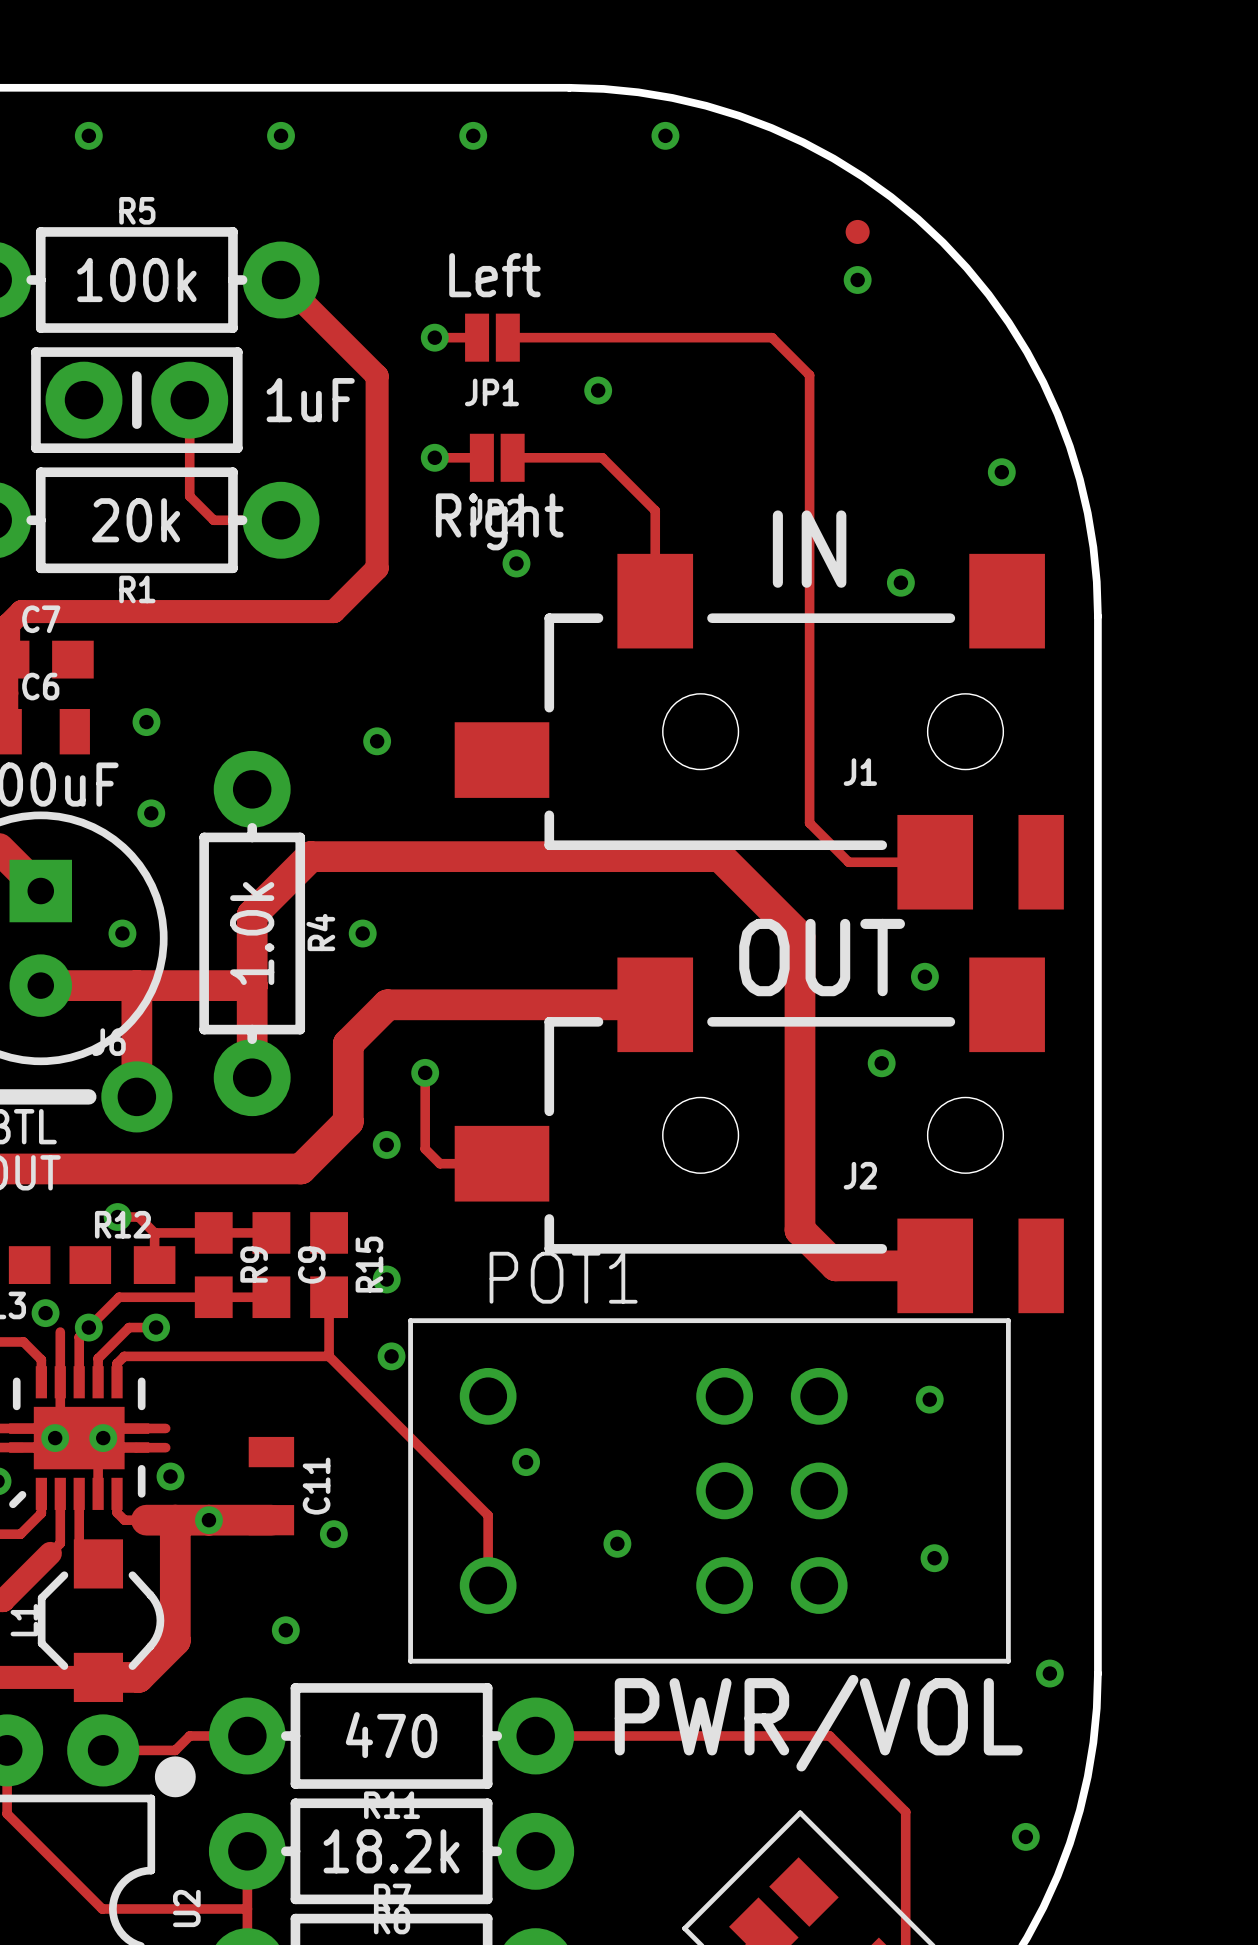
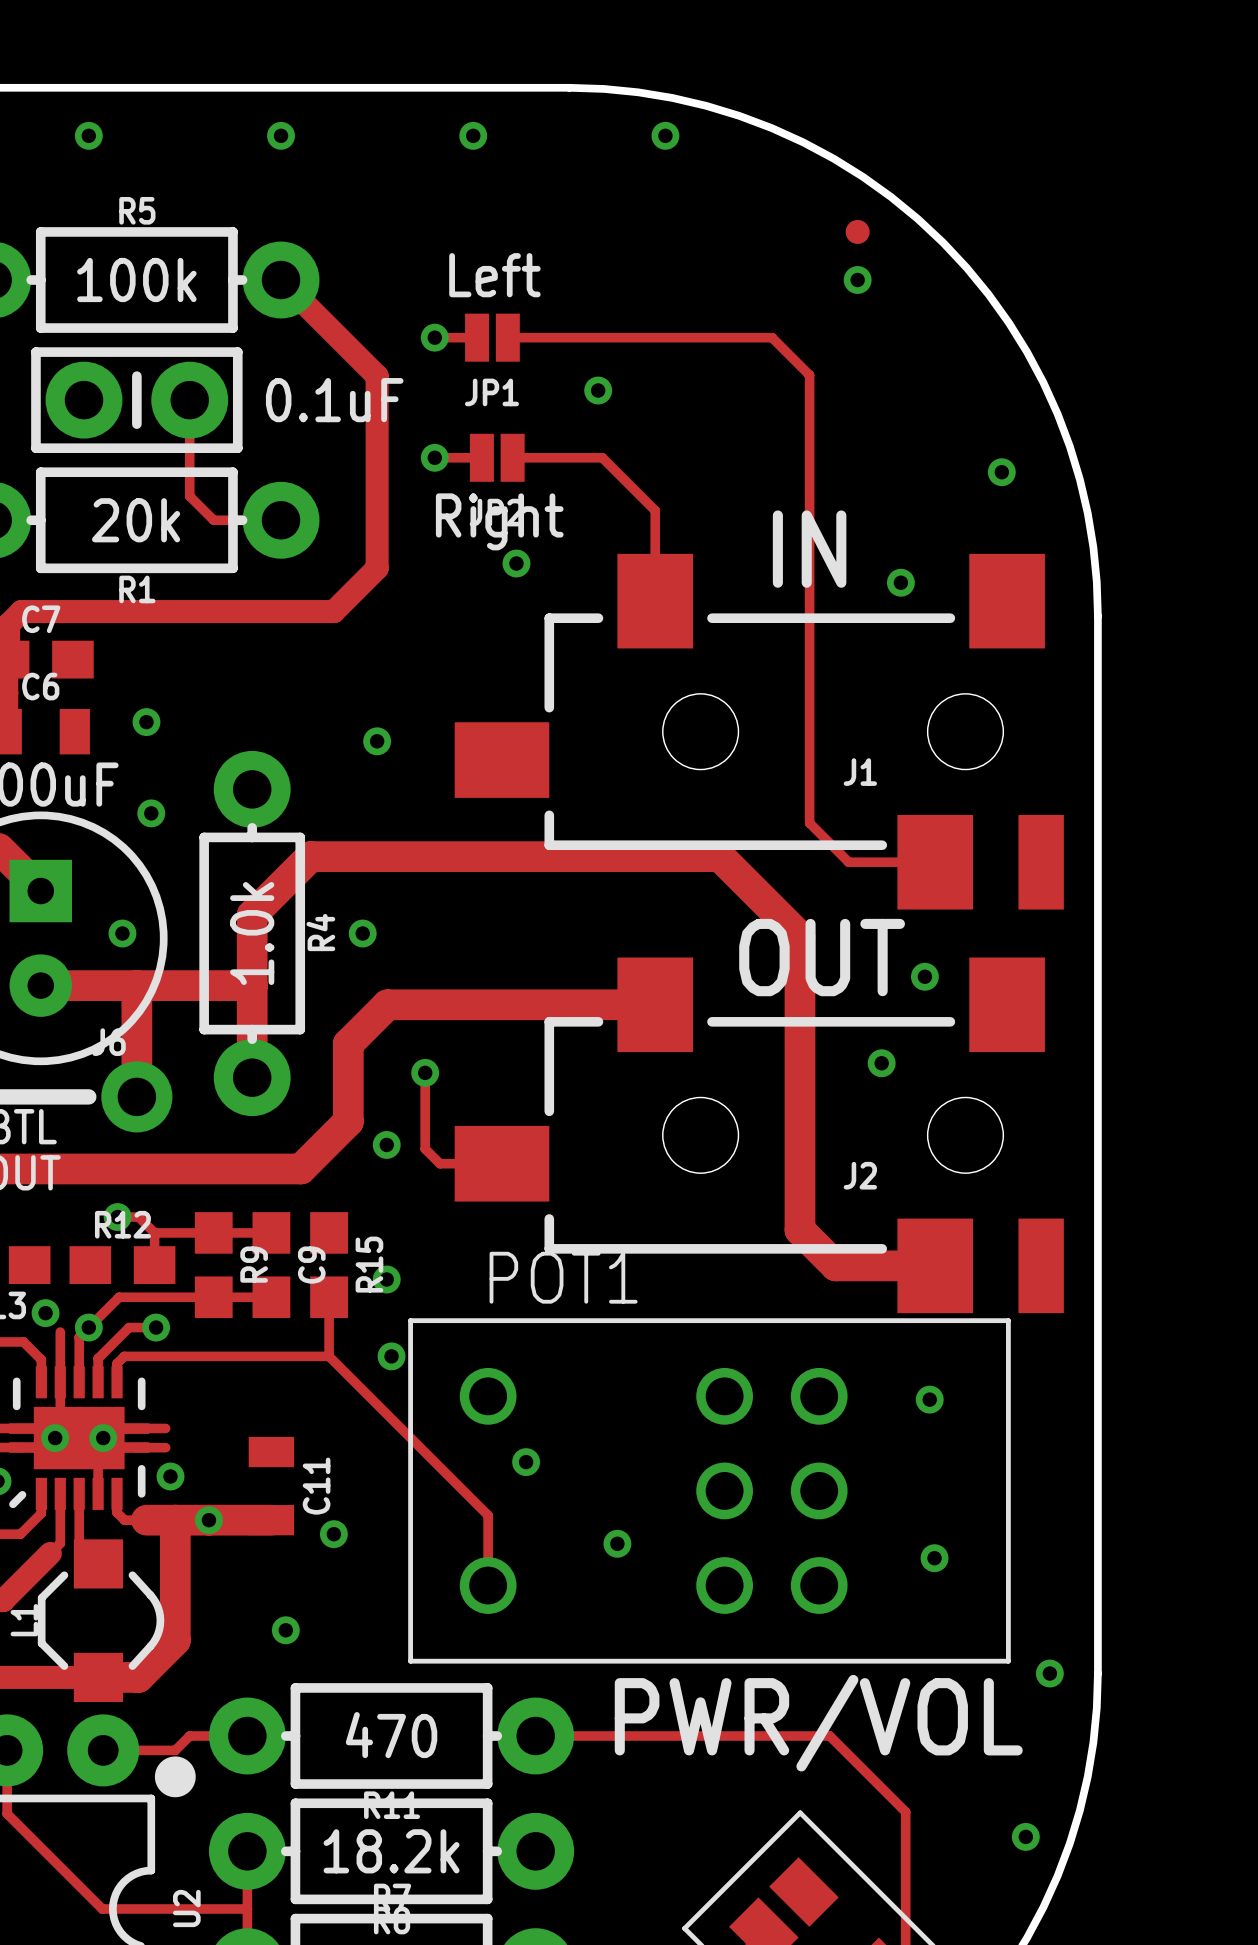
text: 1uF (310, 400) -> 0.1uF (334, 400)

